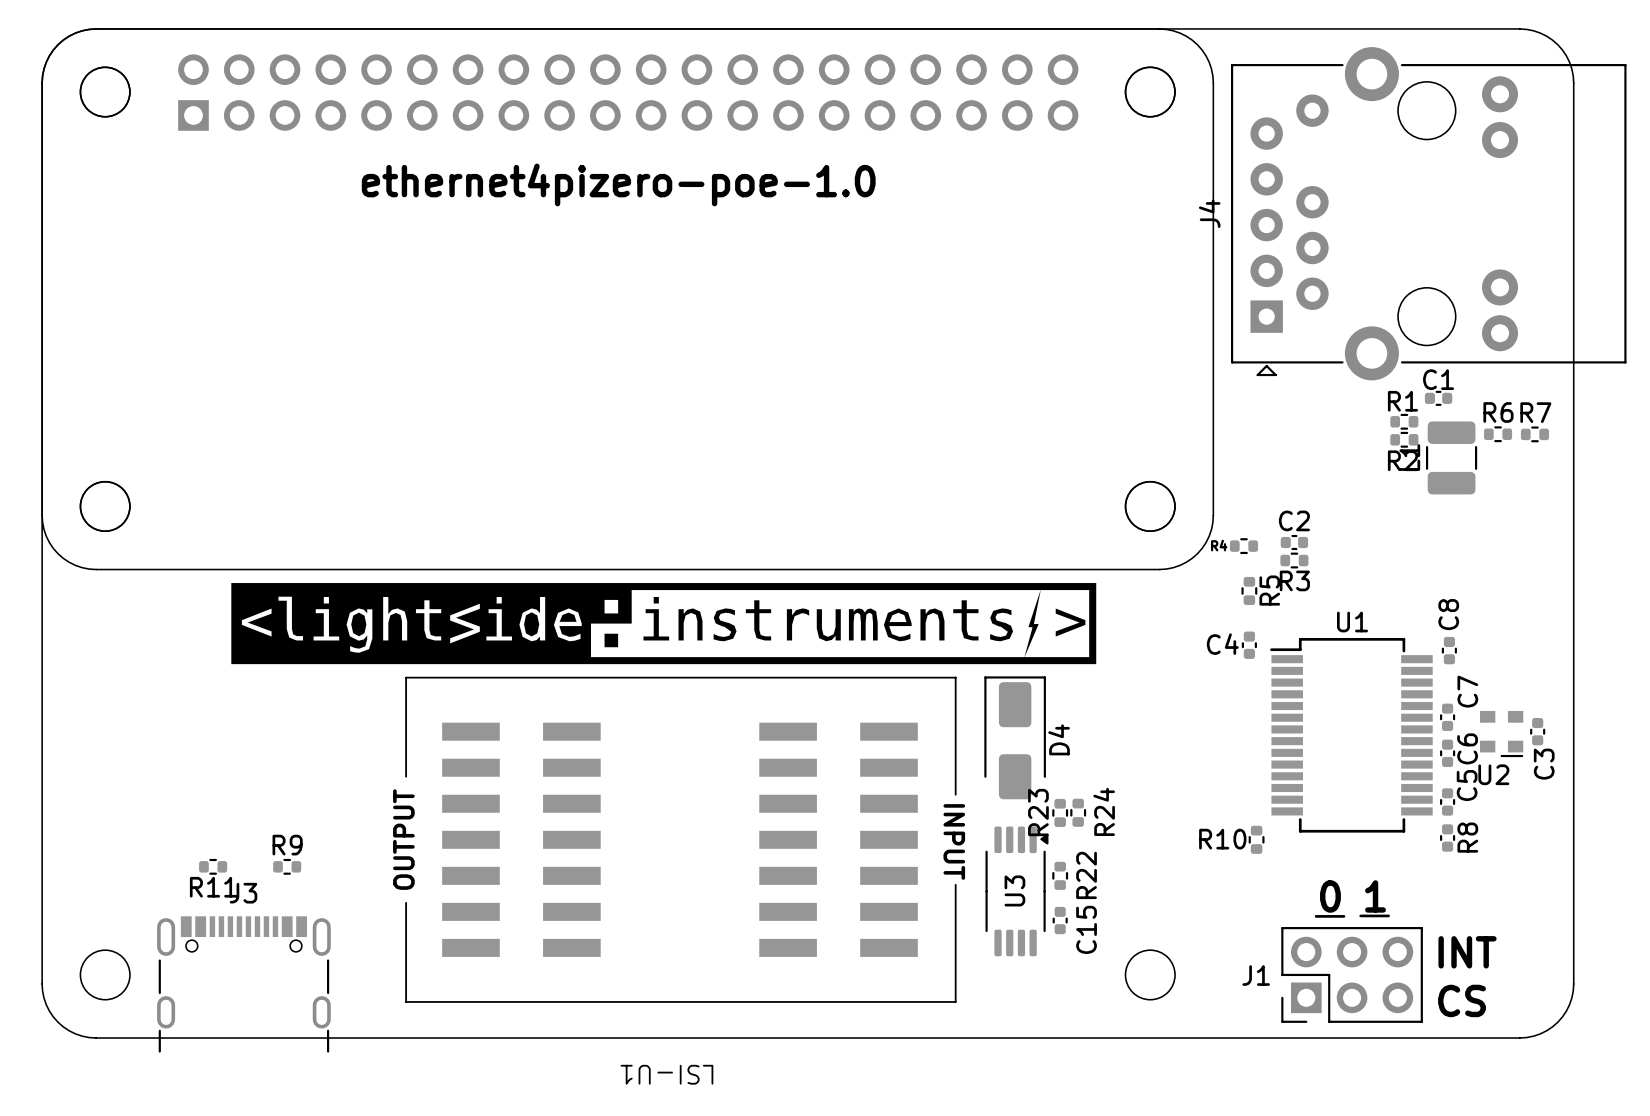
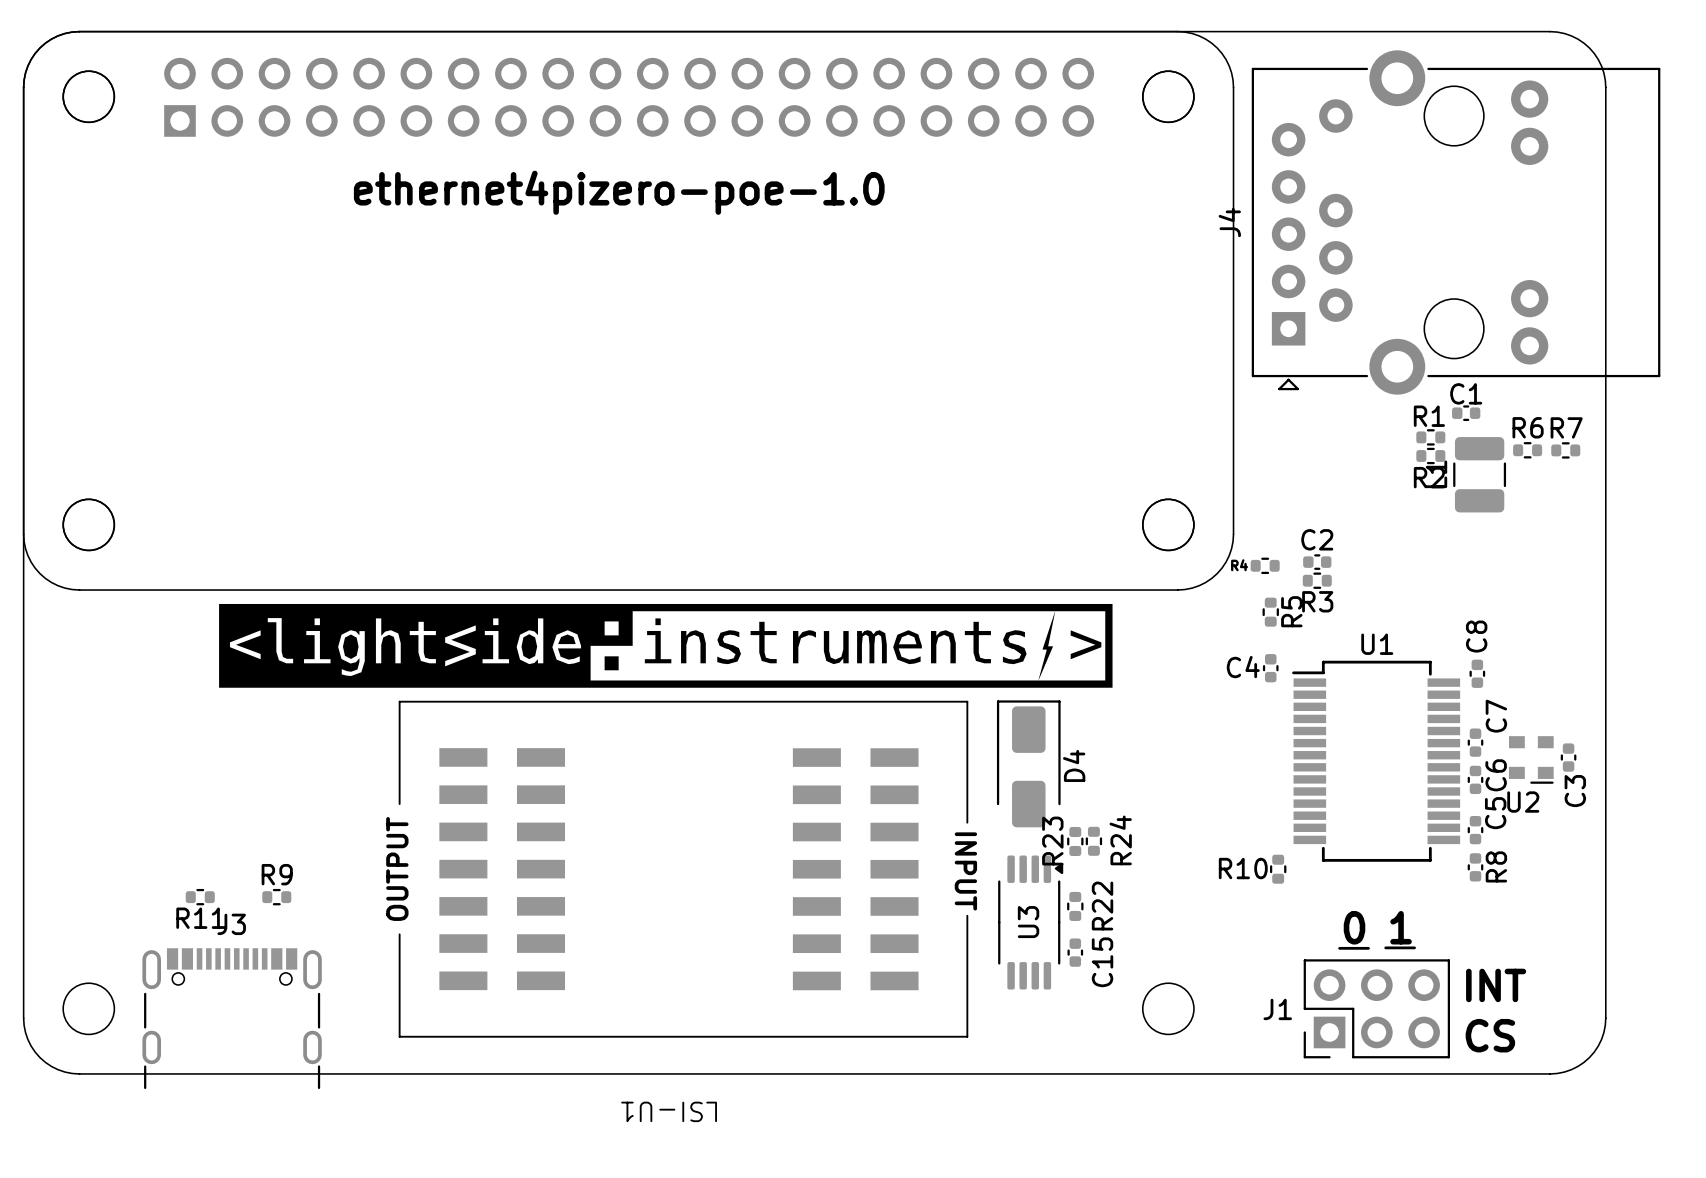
LSI-U1 footprint: [405, 676, 957, 1003] -> [398, 700, 969, 1038]

